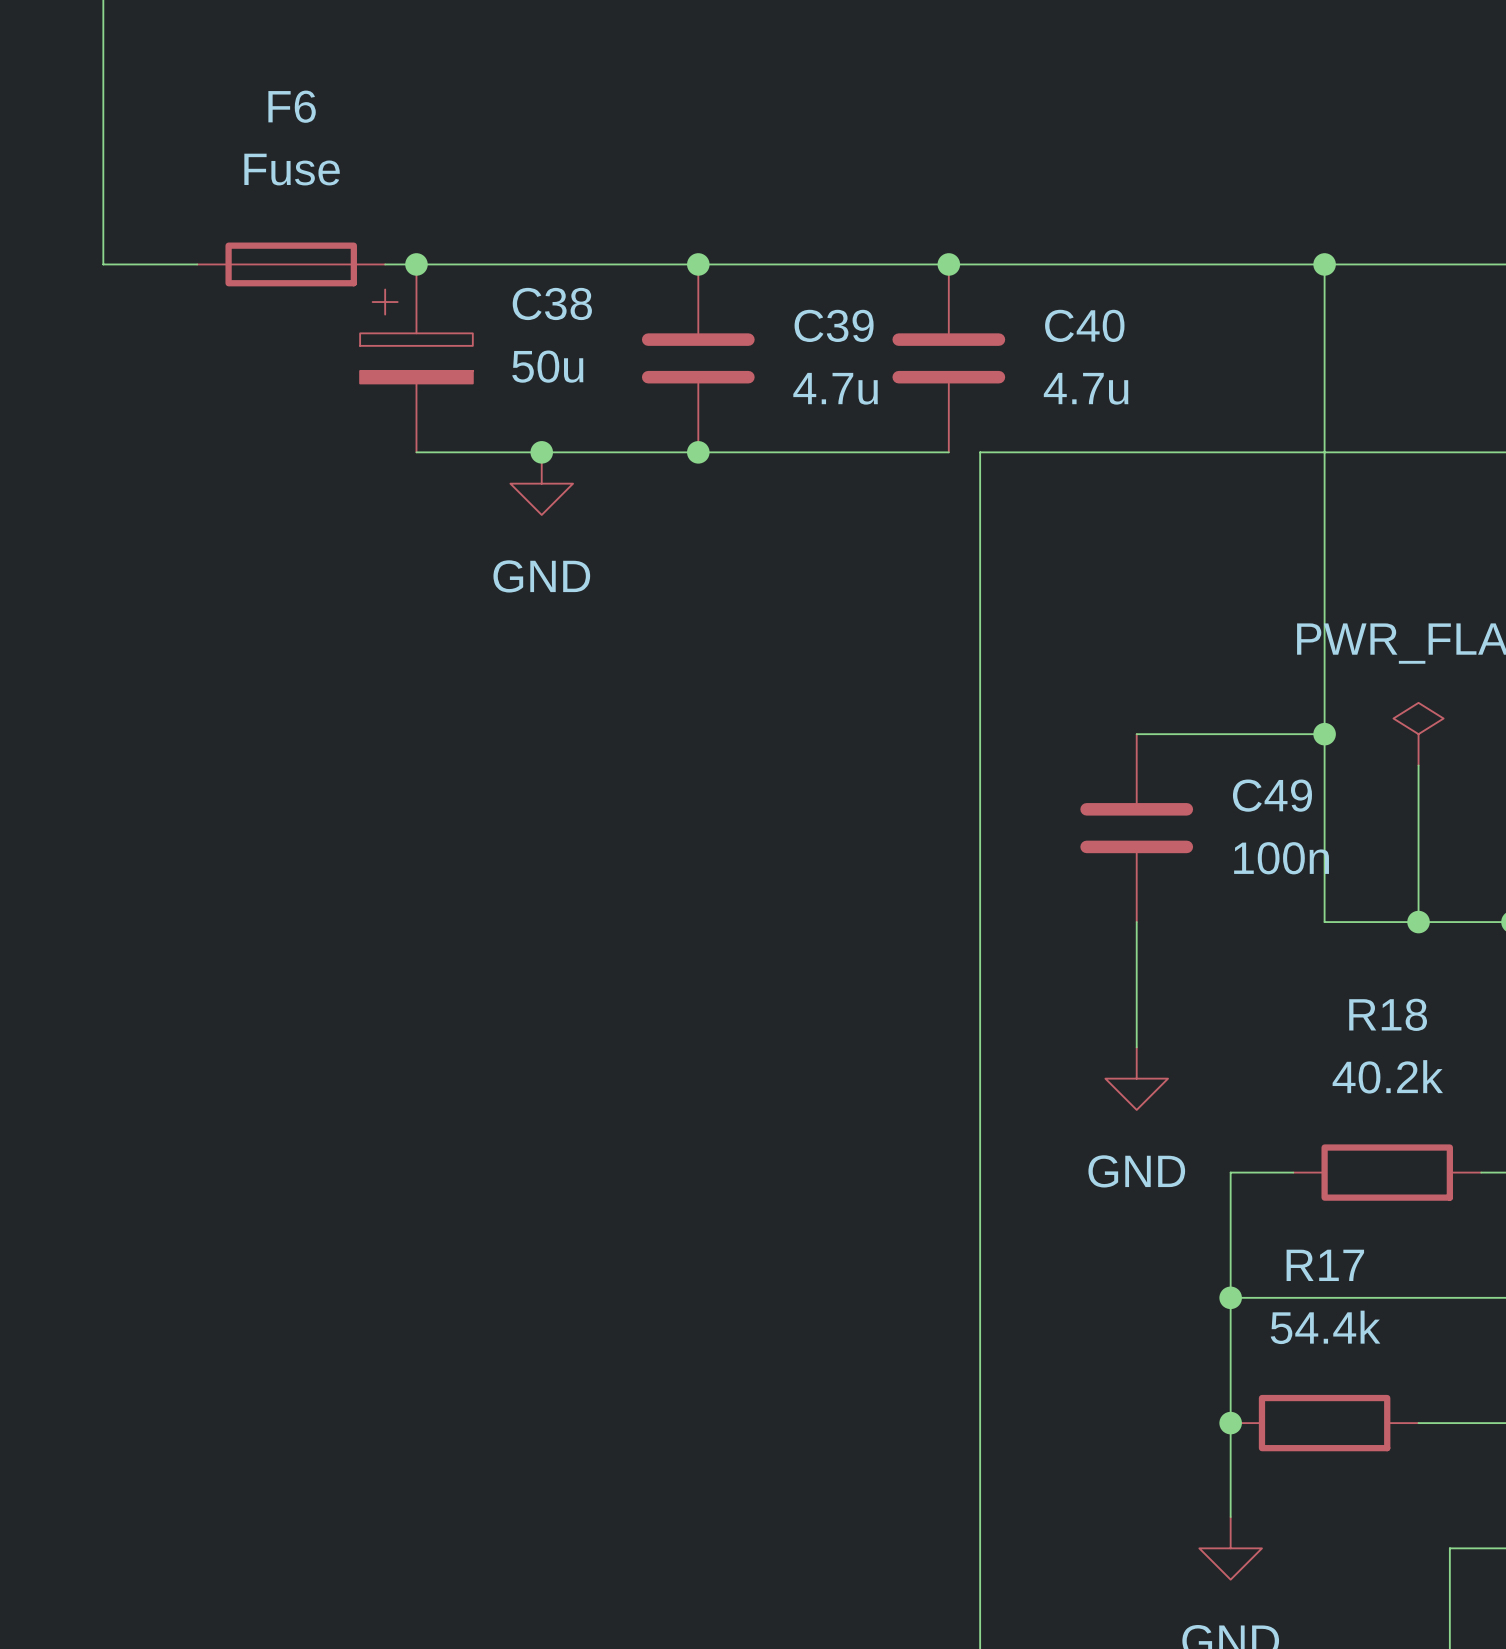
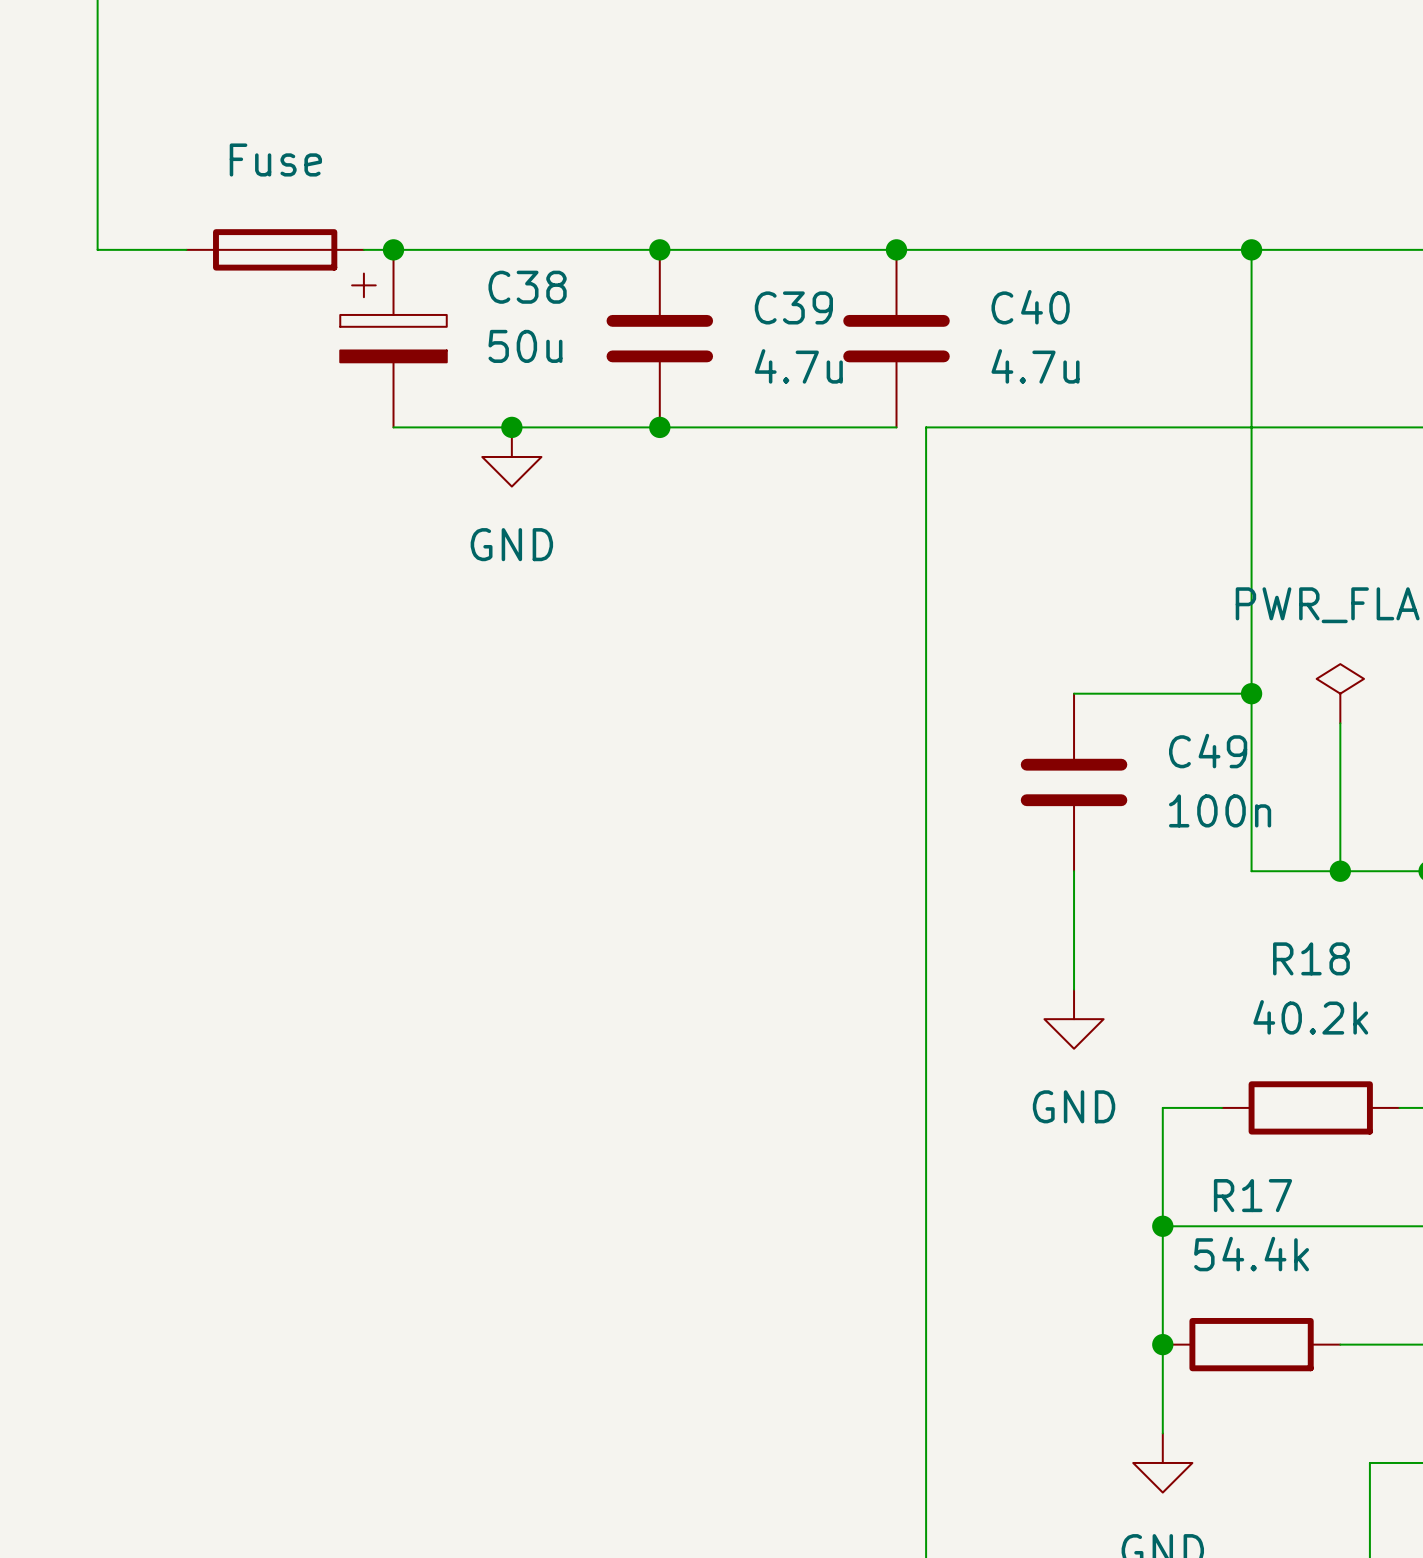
F6 name: F6 (292, 106) -> none

